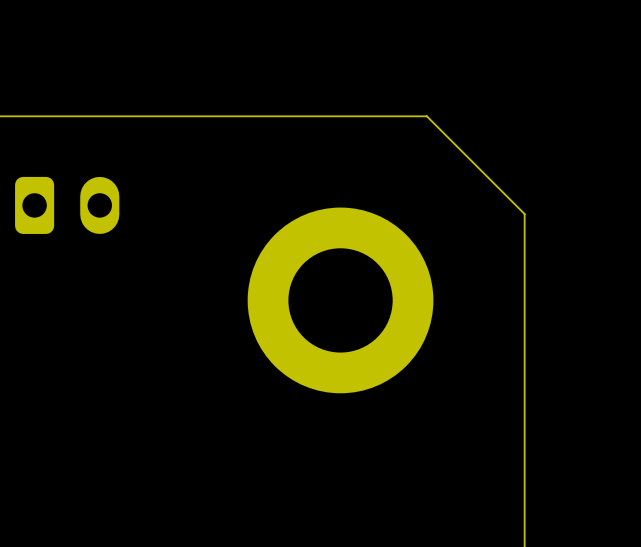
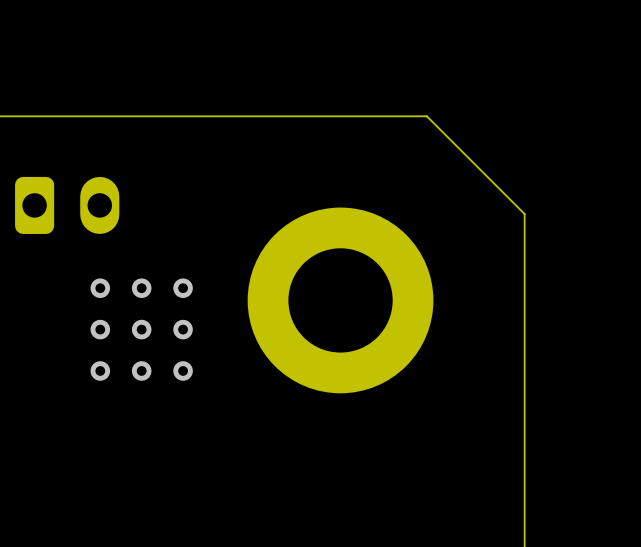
via: none -> (100, 288)
via: none -> (141, 288)
via: none -> (183, 288)
via: none -> (100, 329)
via: none -> (141, 329)
via: none -> (183, 329)
via: none -> (100, 370)
via: none -> (141, 370)
via: none -> (183, 370)

